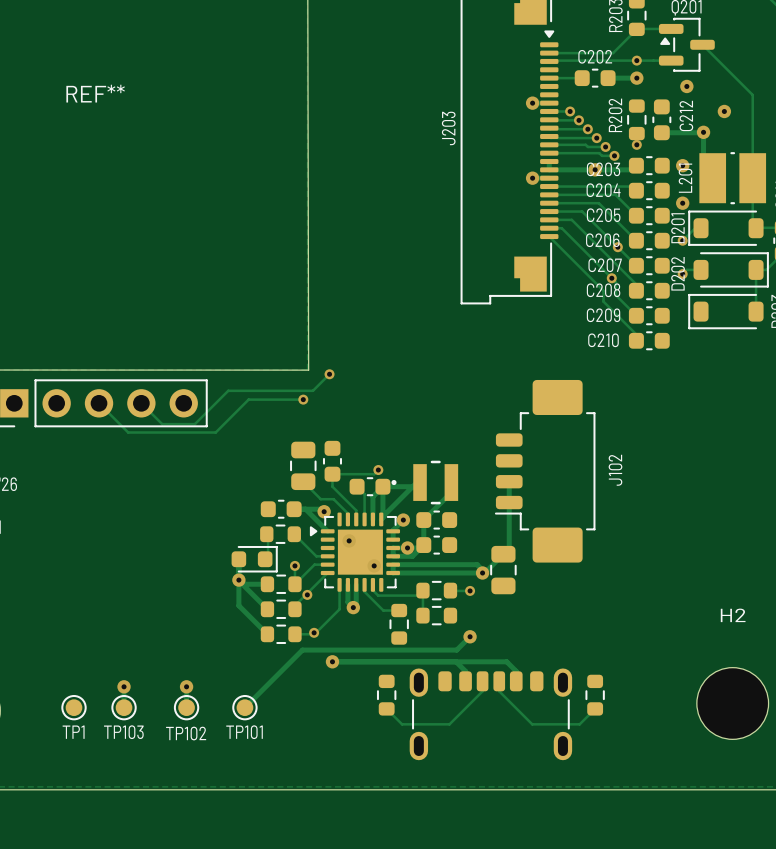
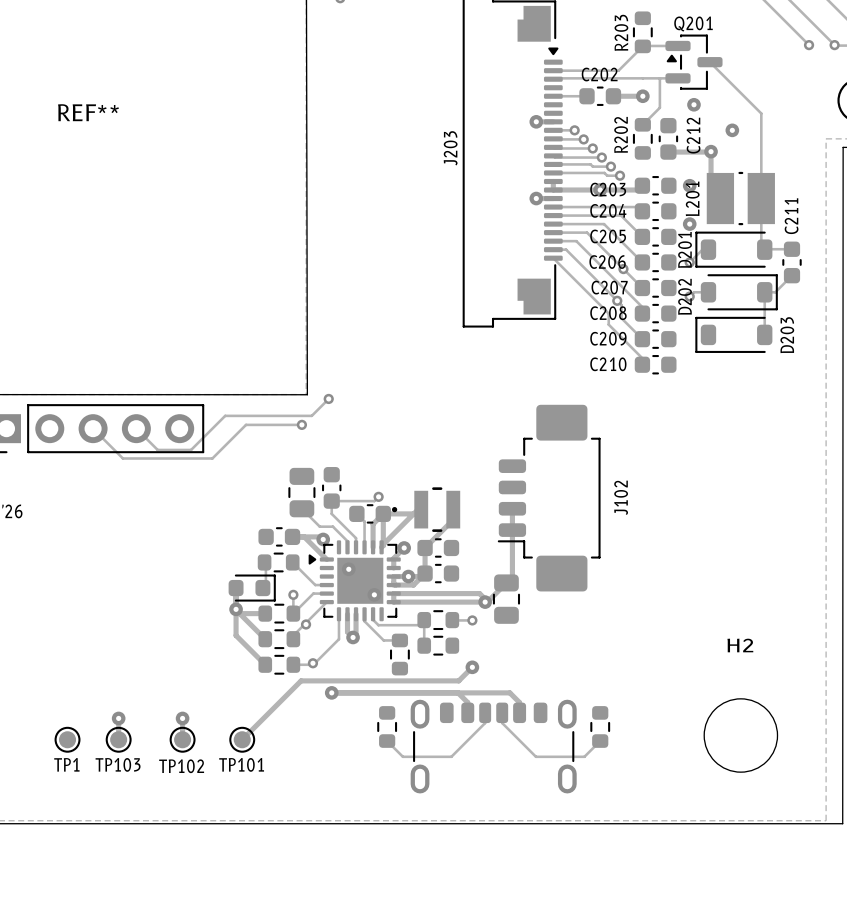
via: (636, 60) -> none
track: none -> (659, 78) (659, 107) (642, 124)
via: (636, 144) -> none

